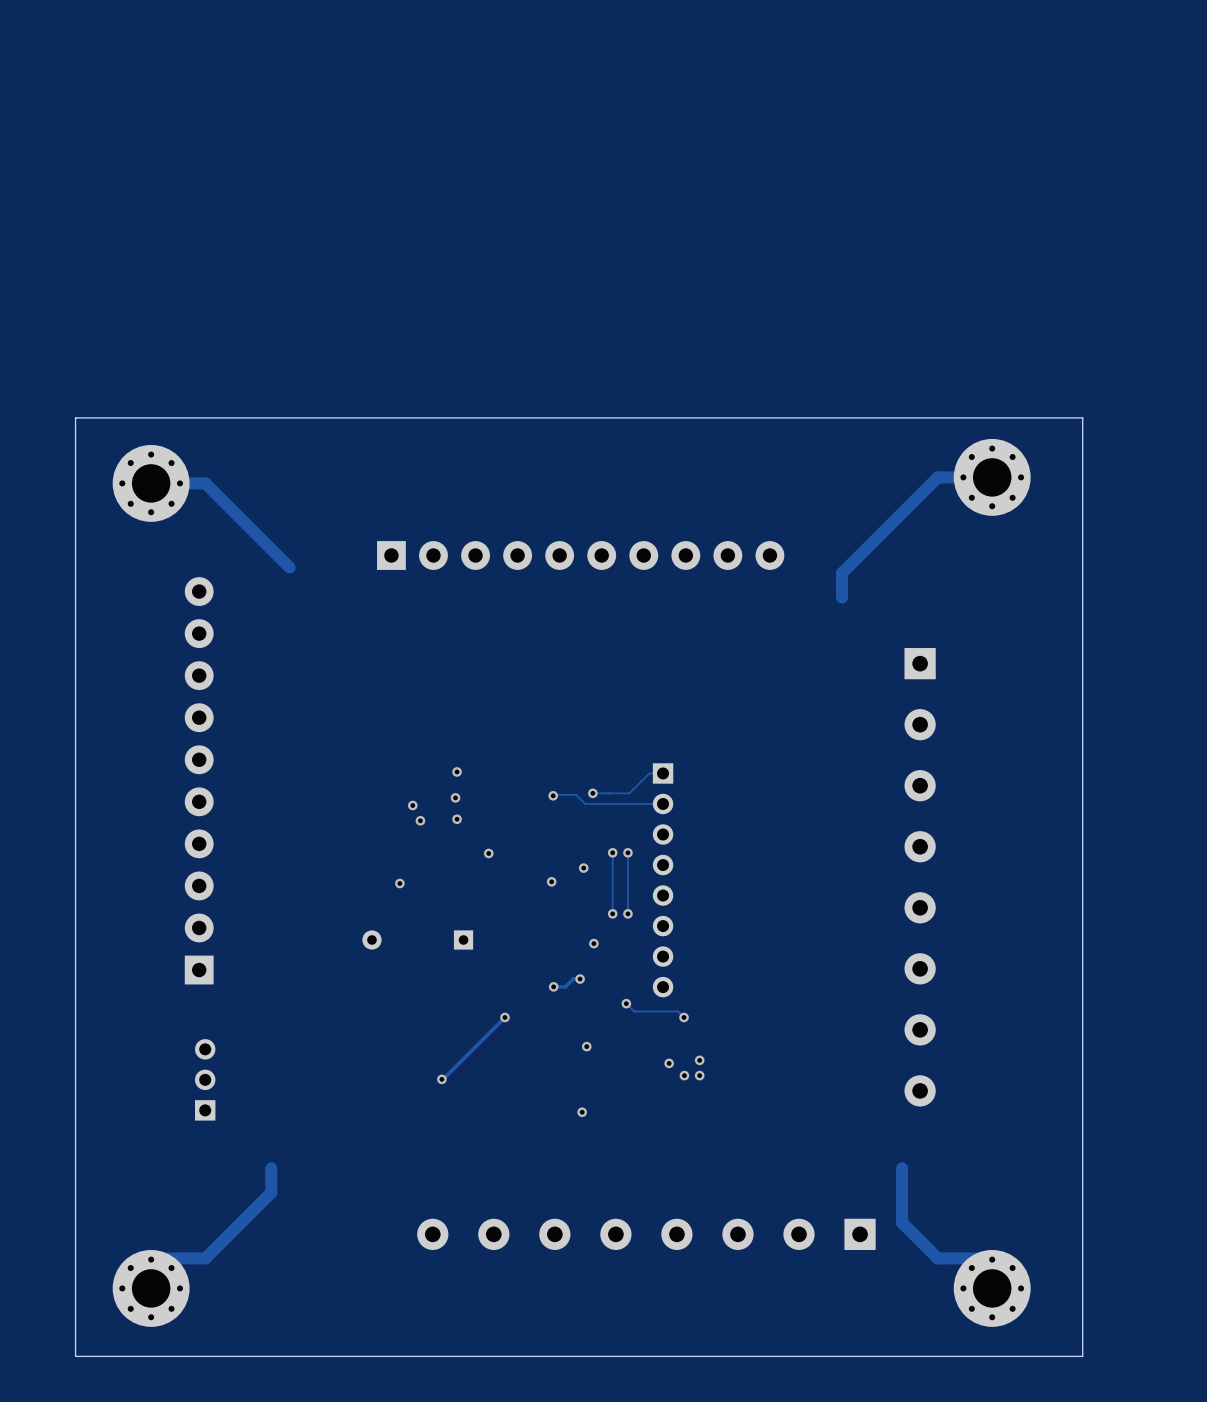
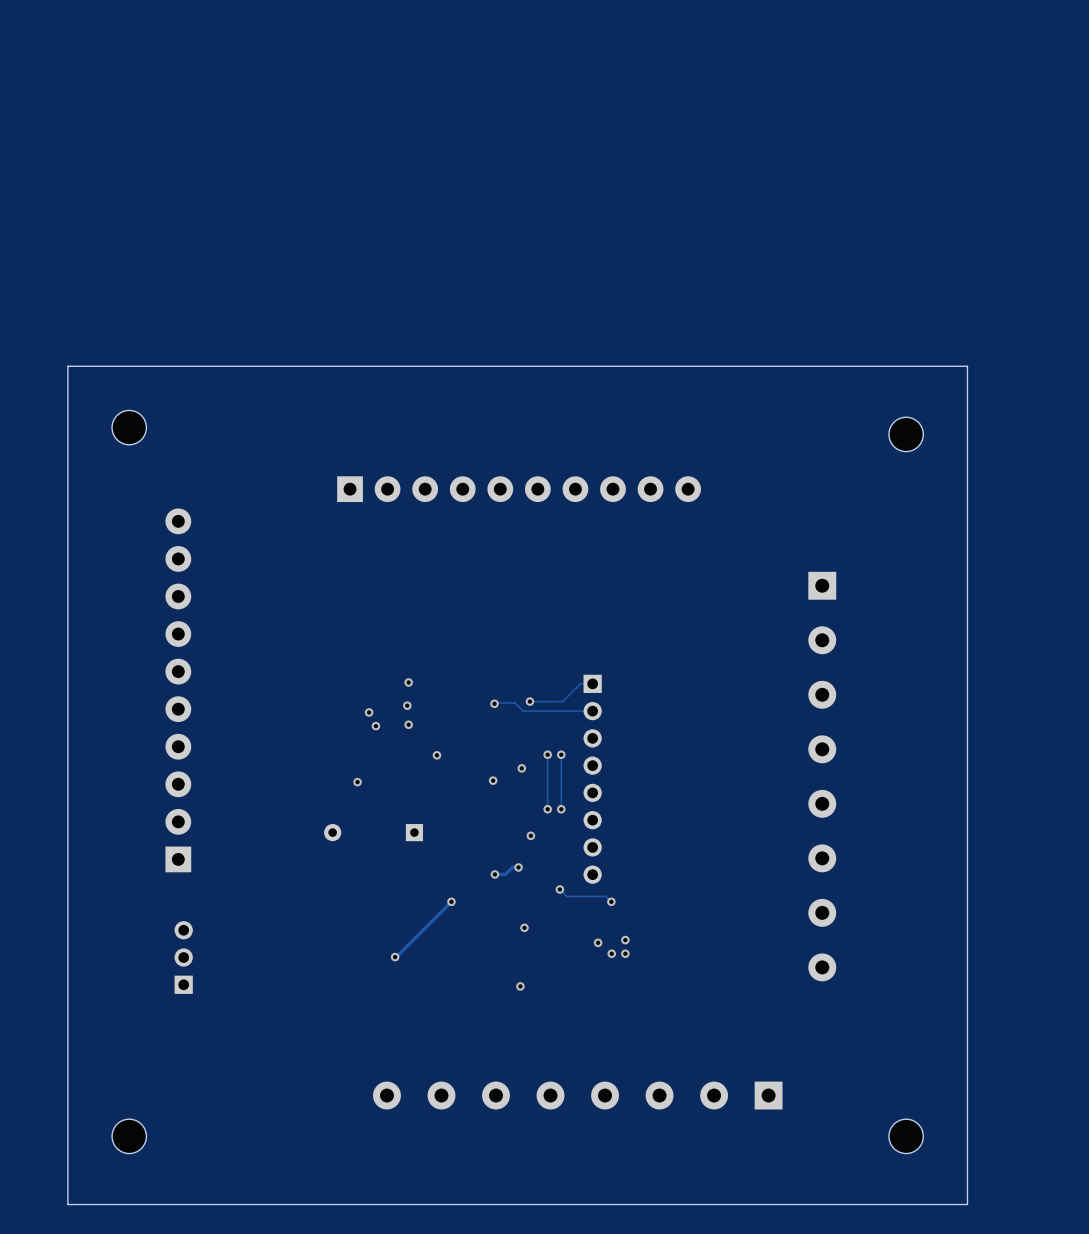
part footprint: [112, 444, 190, 522] -> [112, 410, 147, 445]
track: (992, 477) (937, 477) (842, 573) (842, 597) -> none
part: (992, 477) -> none
track: (151, 483) (205, 483) (289, 567) -> none
part: none -> (906, 434)
track: (271, 1168) (271, 1192) (205, 1258) (151, 1258) -> none
track: (902, 1168) (902, 1222) (937, 1258) (992, 1258) -> none
part footprint: [112, 1249, 190, 1327] -> [112, 1119, 147, 1154]
part: none -> (906, 1136)
part: (992, 1288) -> none

